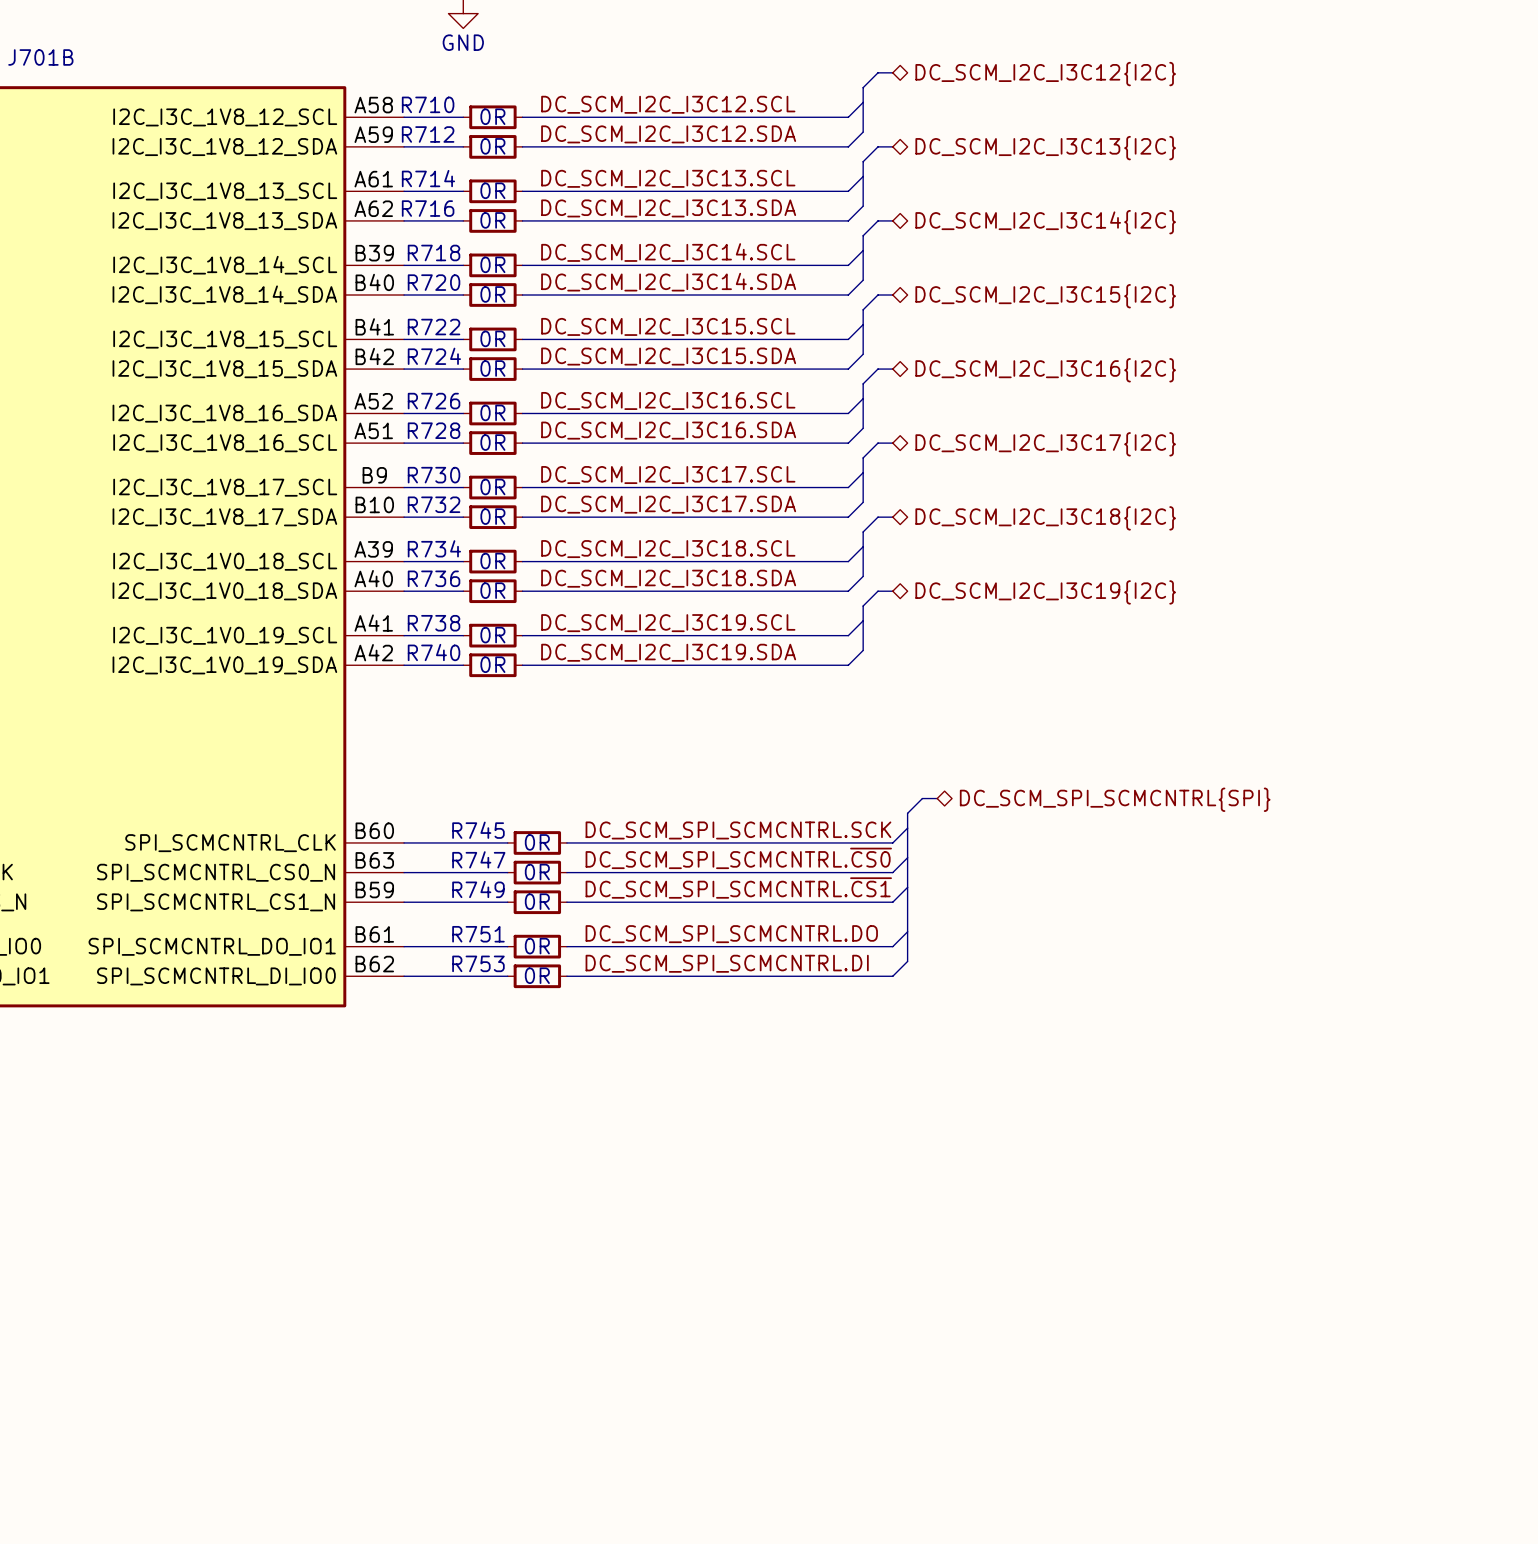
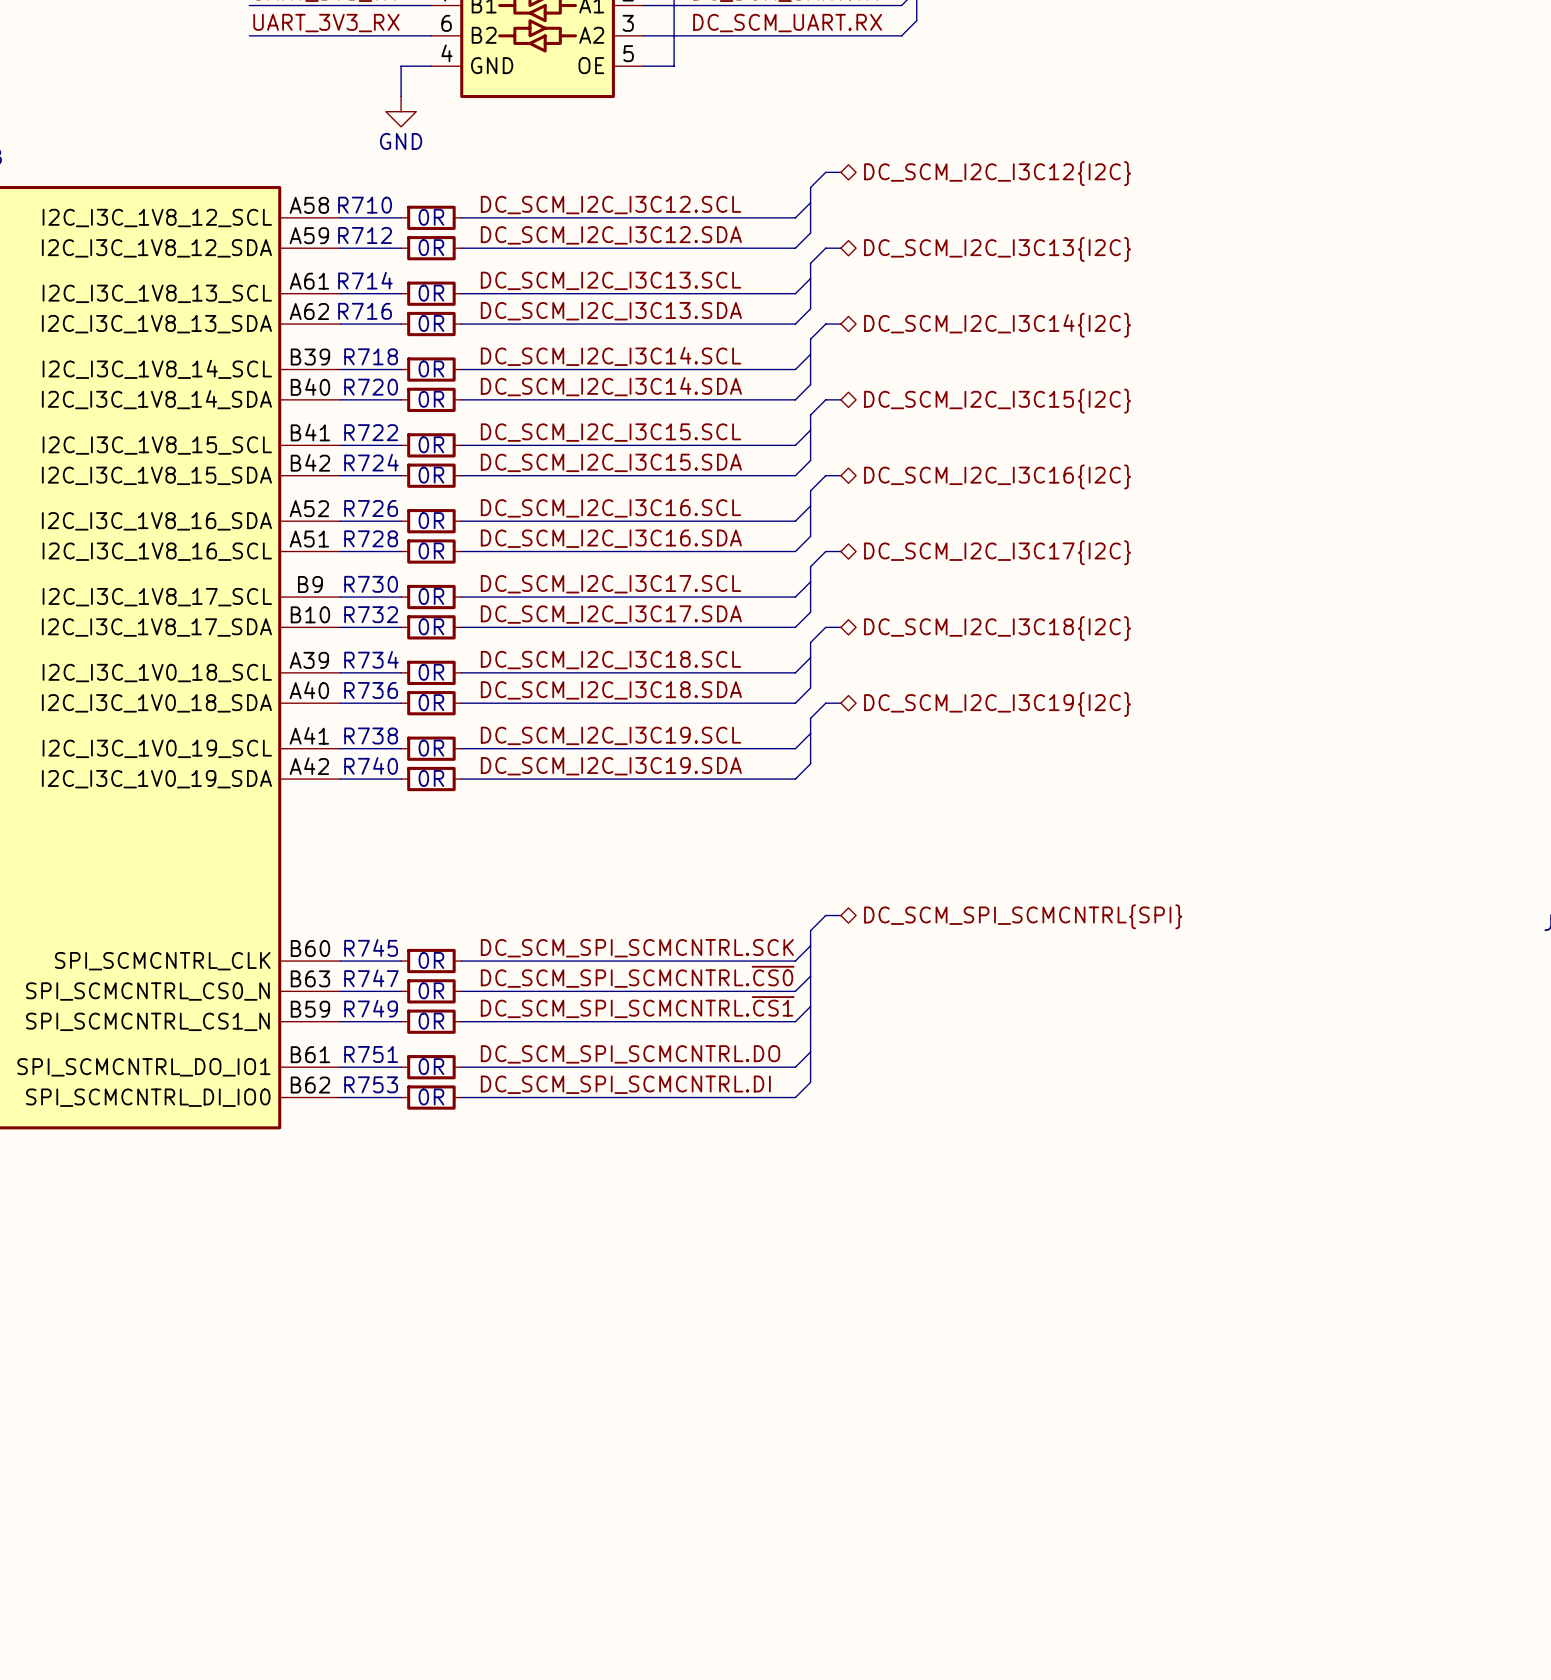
bus: (937, 798) (922, 798) (907, 813) (907, 961) -> (840, 915) (825, 915) (810, 930) (810, 1082)
hierarchical label position: DC_SCM_SPI_SCMCNTRL{SPI} (1115, 799) -> DC_SCM_SPI_SCMCNTRL{SPI} (1023, 916)
wire: (907, 828) (892, 842) (848, 842) -> (810, 945) (795, 961)
label position: DC_SCM_SPI_SCMCNTRL.SCK (738, 830) -> DC_SCM_SPI_SCMCNTRL.SCK (637, 948)
wire: (463, 842) (507, 842) -> (461, 961) (507, 961)
R745 position: (537, 842) -> (431, 961)
wire: (907, 857) (892, 872) (848, 872) -> (810, 976) (795, 991)
label position: DC_SCM_SPI_SCMCNTRL.~{CS0} (738, 858) -> DC_SCM_SPI_SCMCNTRL.~{CS0} (637, 976)
wire: (463, 872) (507, 872) -> (461, 991) (507, 991)
R747 position: (537, 872) -> (431, 991)
wire: (907, 887) (892, 902) (848, 902) -> (810, 1006) (795, 1021)
label position: DC_SCM_SPI_SCMCNTRL.~{CS1} (738, 888) -> DC_SCM_SPI_SCMCNTRL.~{CS1} (637, 1007)
wire: (463, 902) (507, 902) -> (461, 1021) (507, 1021)
R749 position: (537, 902) -> (431, 1021)
wire: (907, 931) (892, 946) (848, 946) -> (810, 1052) (795, 1067)
label position: DC_SCM_SPI_SCMCNTRL.DO (731, 934) -> DC_SCM_SPI_SCMCNTRL.DO (630, 1054)
wire: (463, 946) (507, 946) -> (461, 1067) (507, 1067)
R751 position: (537, 946) -> (431, 1067)
wire: (907, 961) (892, 976) (848, 976) -> (810, 1082) (795, 1097)
label position: DC_SCM_SPI_SCMCNTRL.DI (727, 963) -> DC_SCM_SPI_SCMCNTRL.DI (625, 1084)
wire: (463, 976) (507, 976) -> (461, 1097) (507, 1097)
R753 position: (537, 976) -> (431, 1097)

